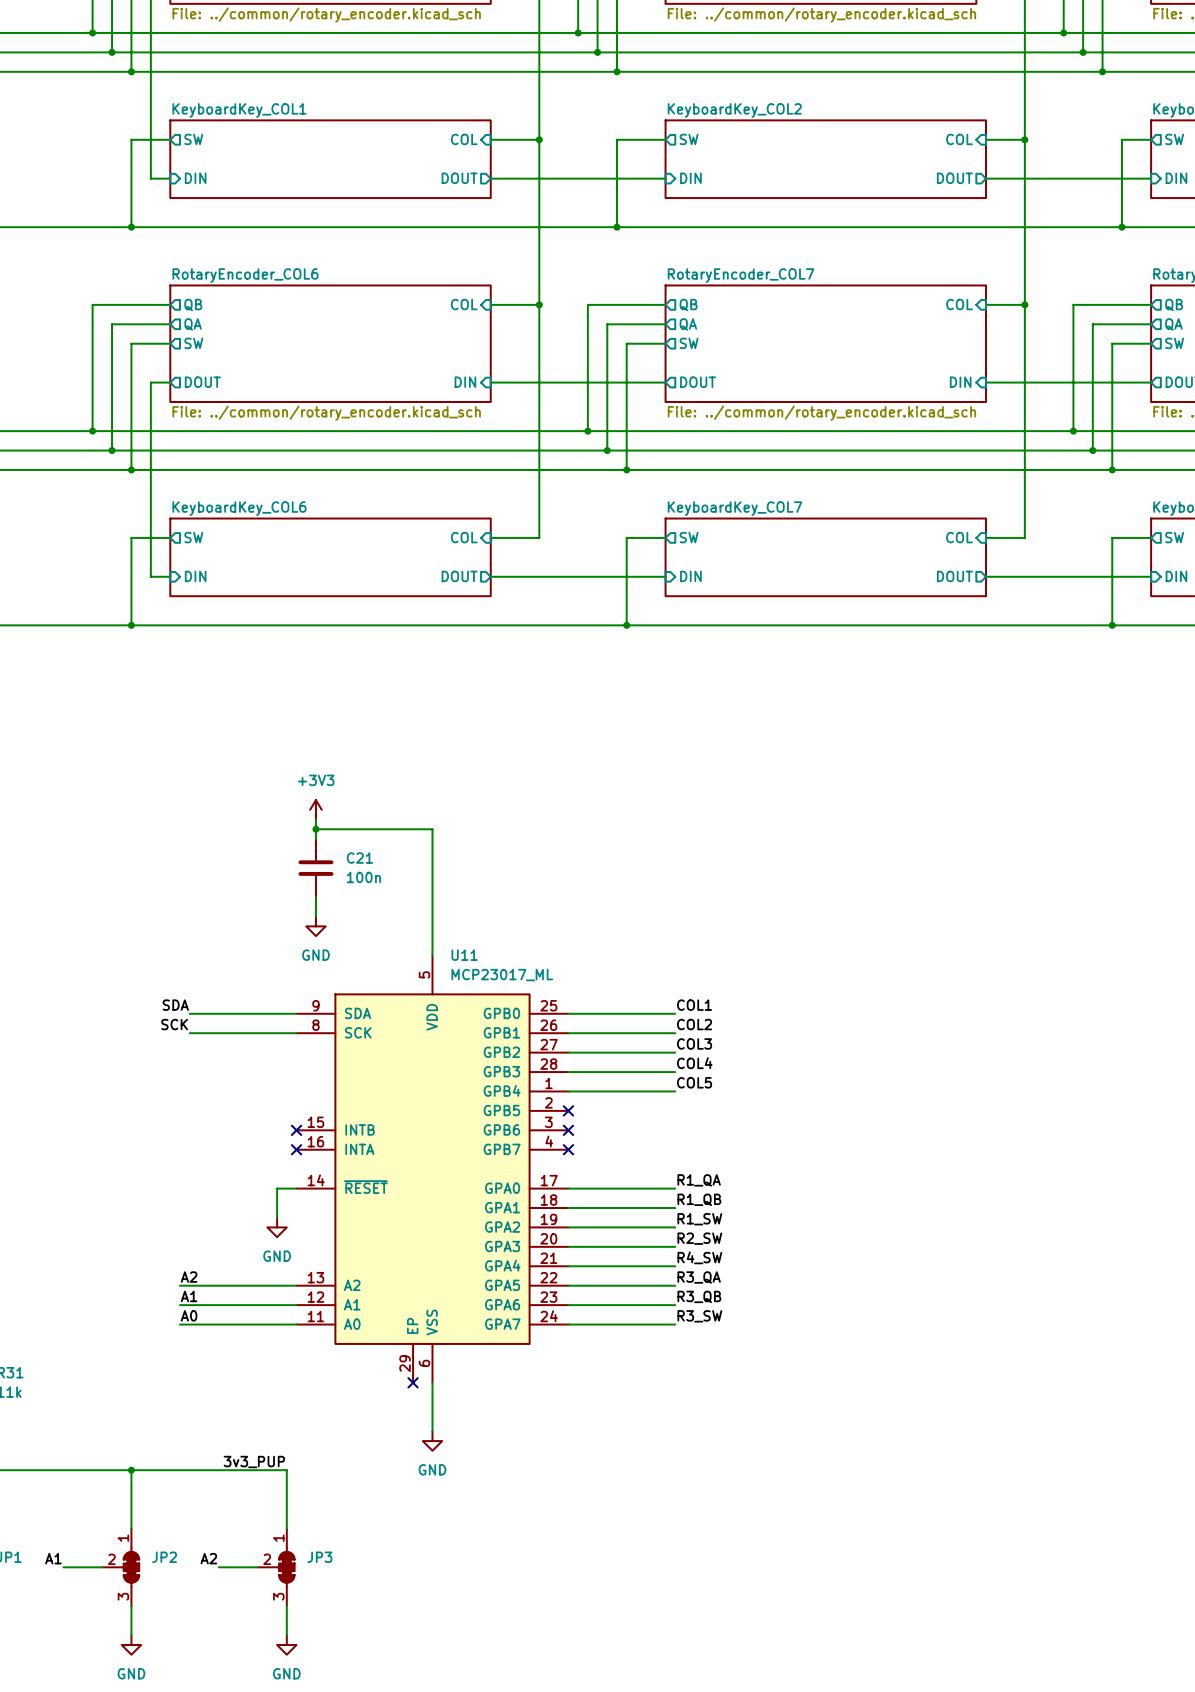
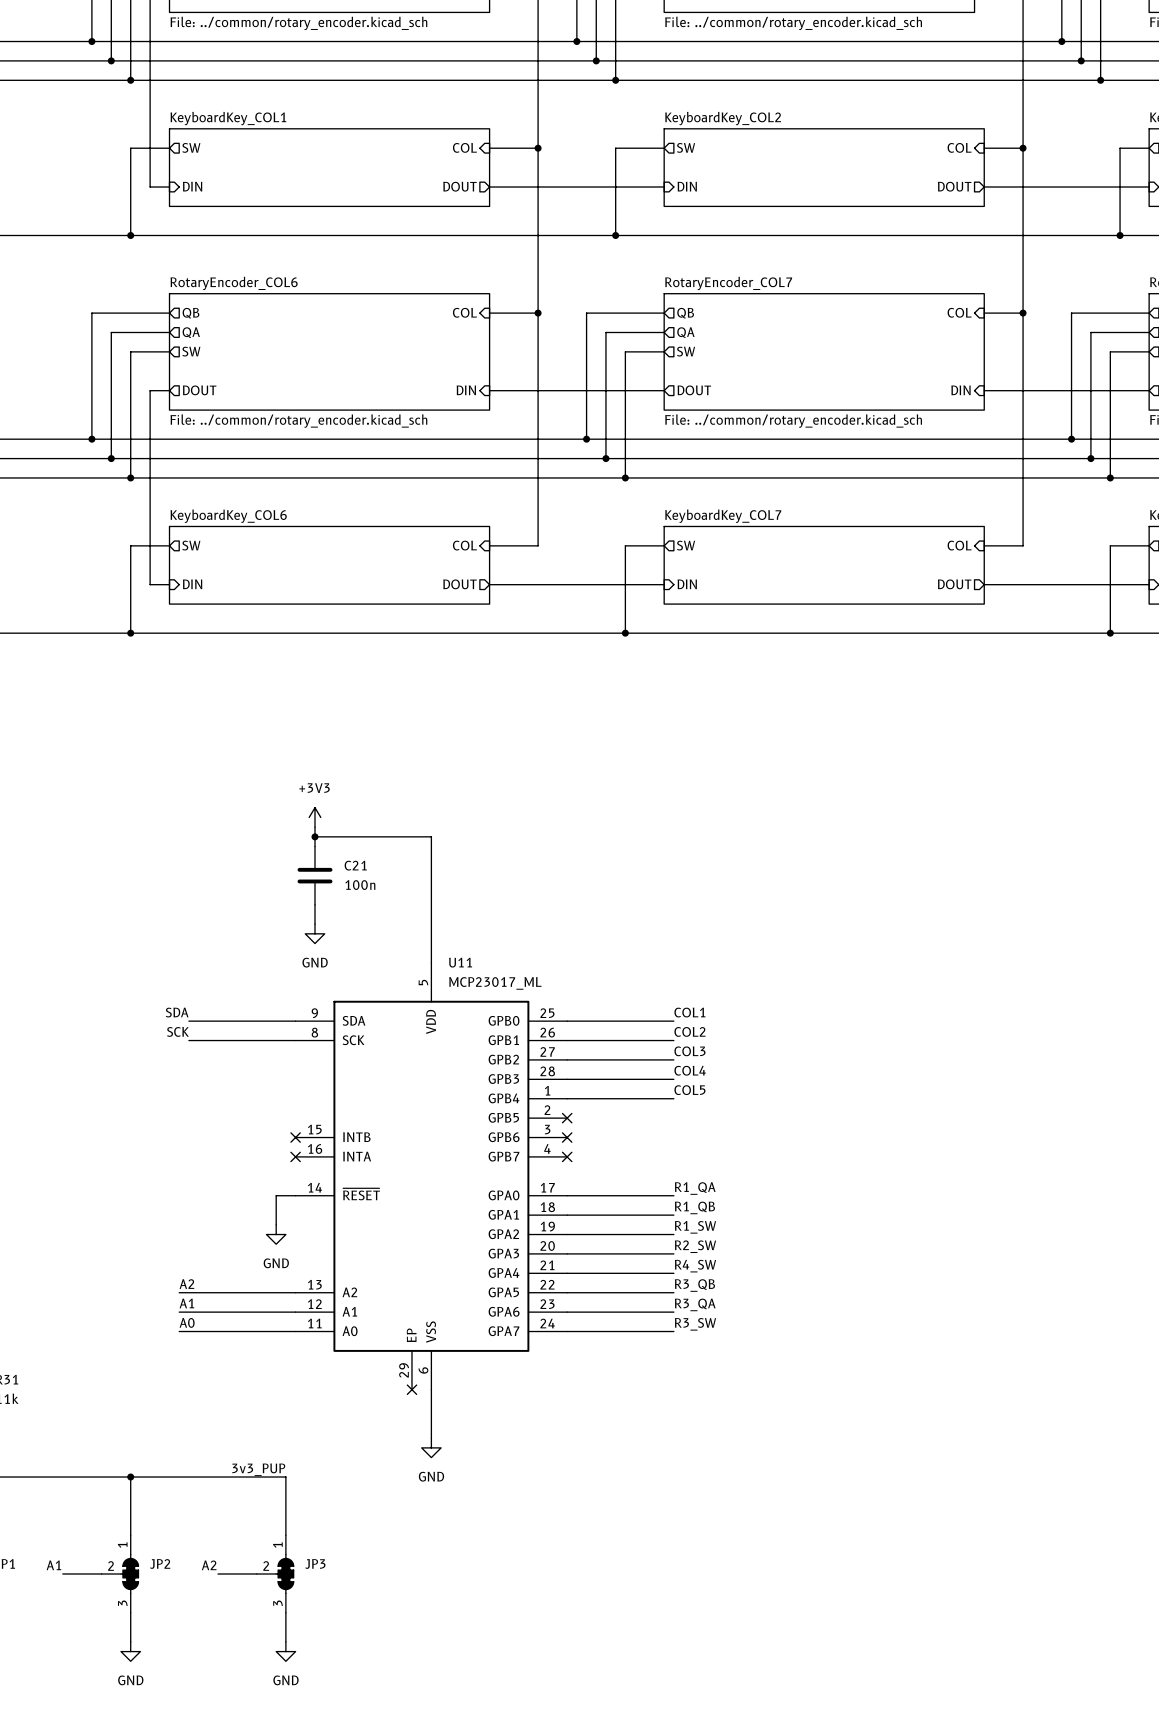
label: R3_QA (699, 1277) -> R3_QB (694, 1285)
label: R3_QB (699, 1296) -> R3_QA (695, 1304)

